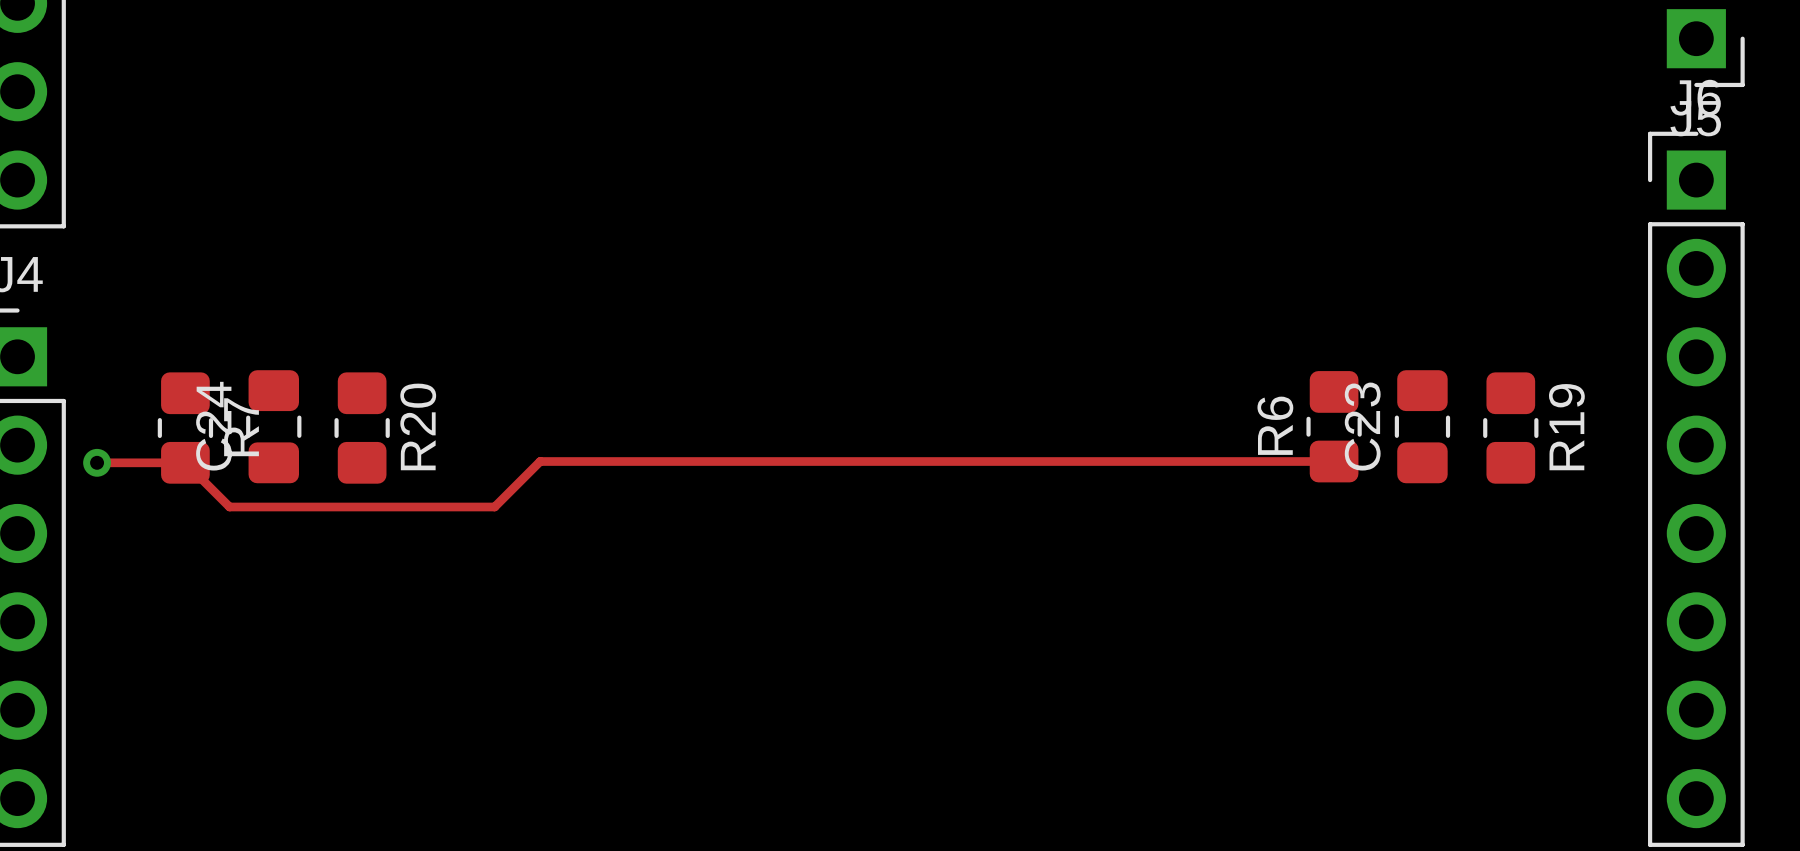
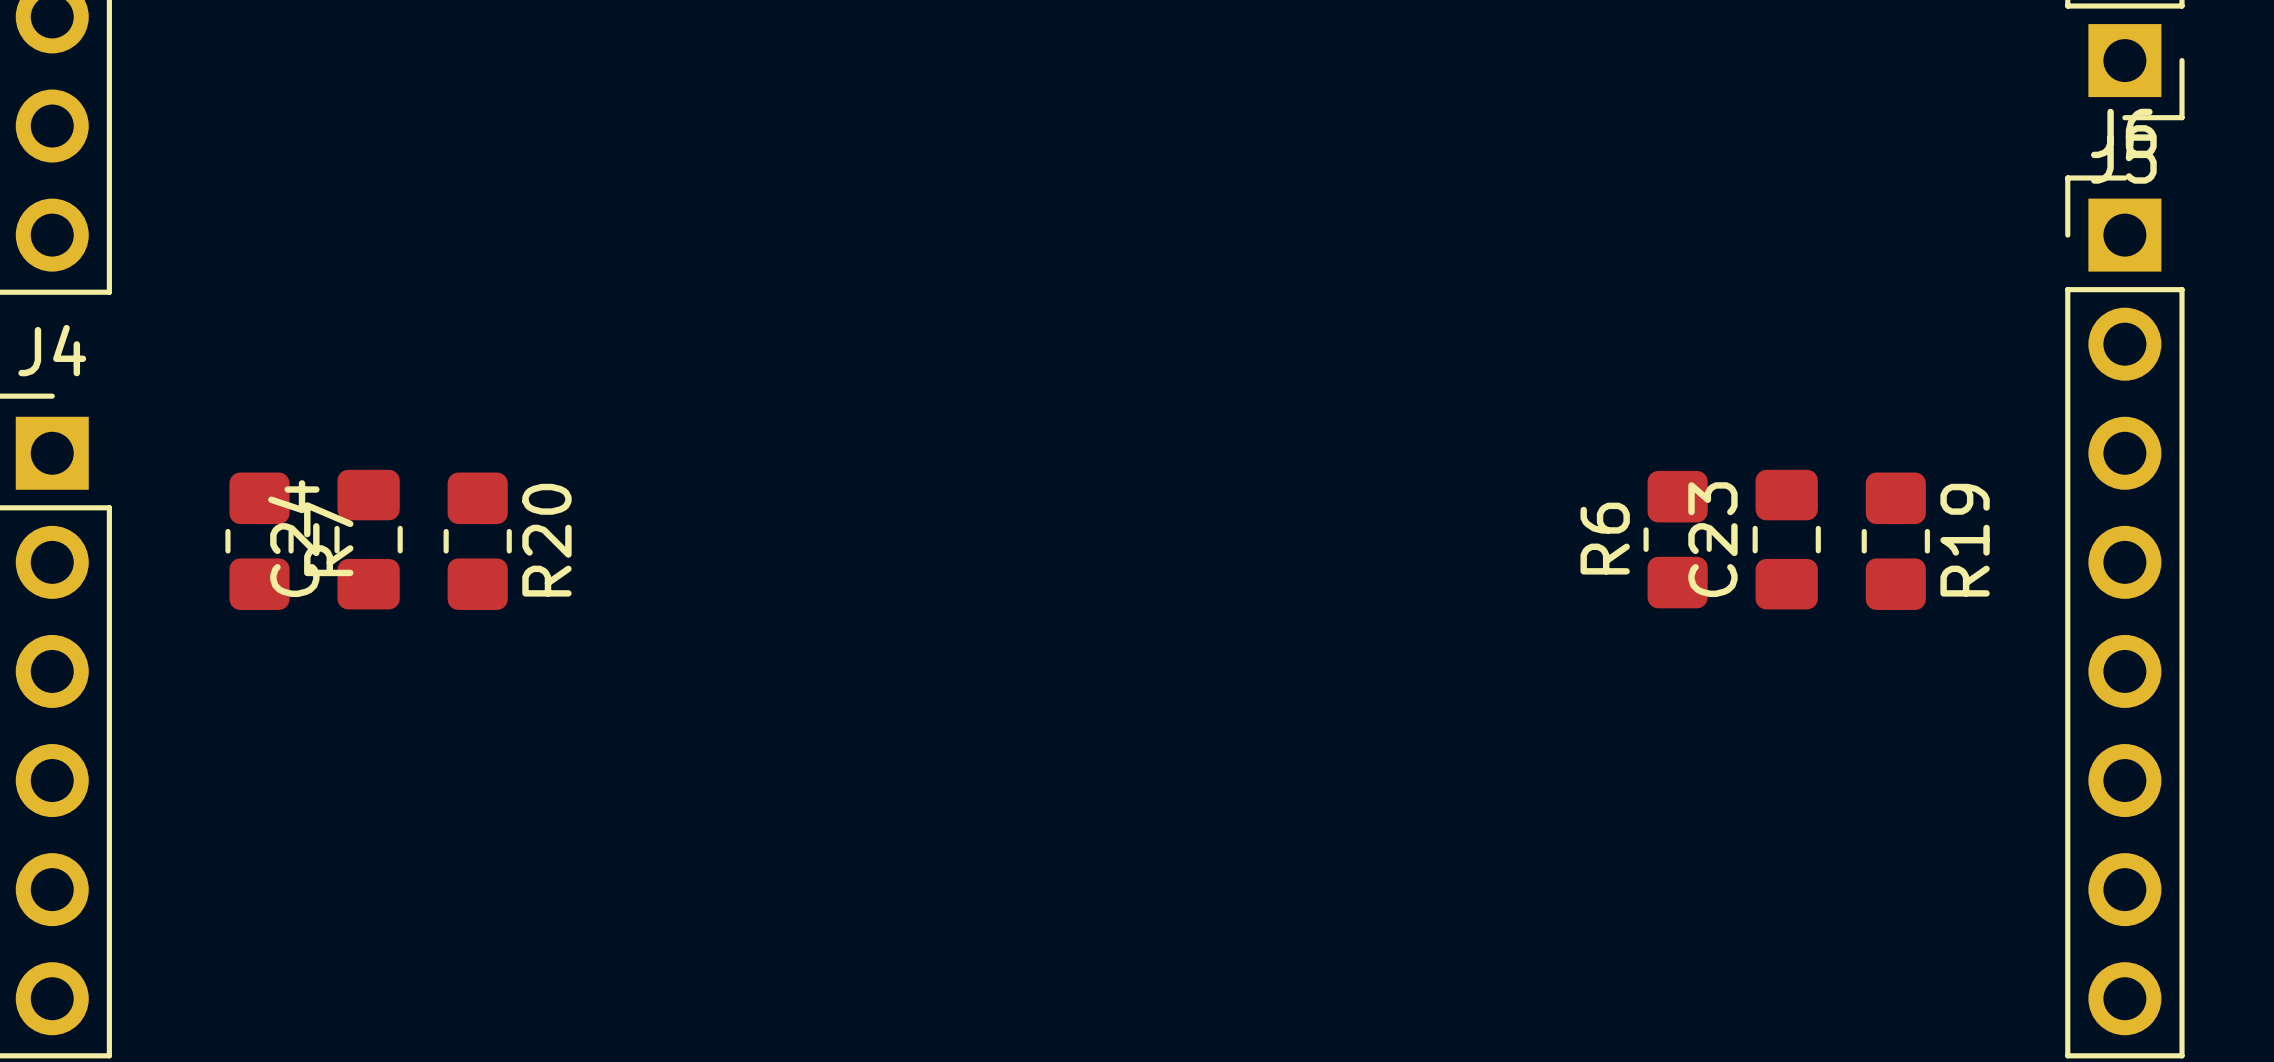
track: (1334, 461) (540, 461) (494, 506) (229, 506) (185, 462) (97, 462) -> none
via: (97, 462) -> none

